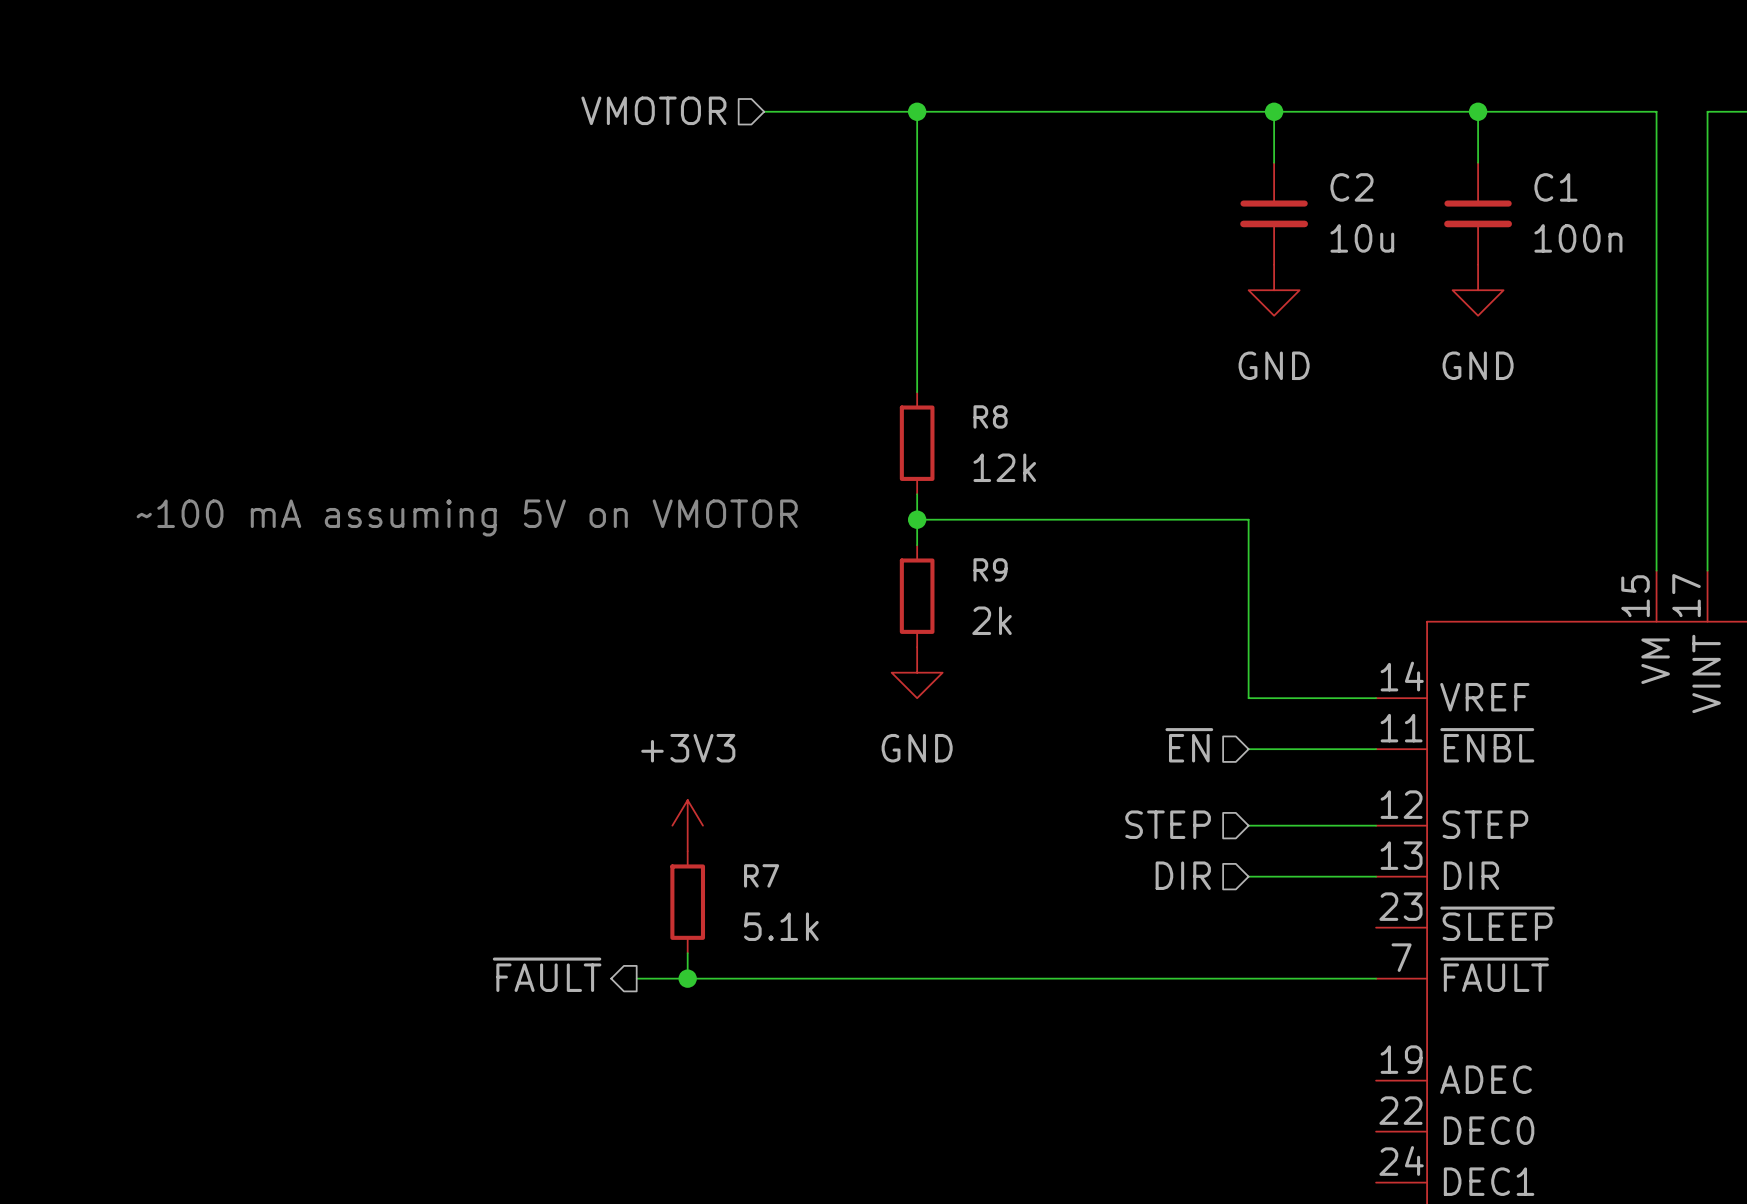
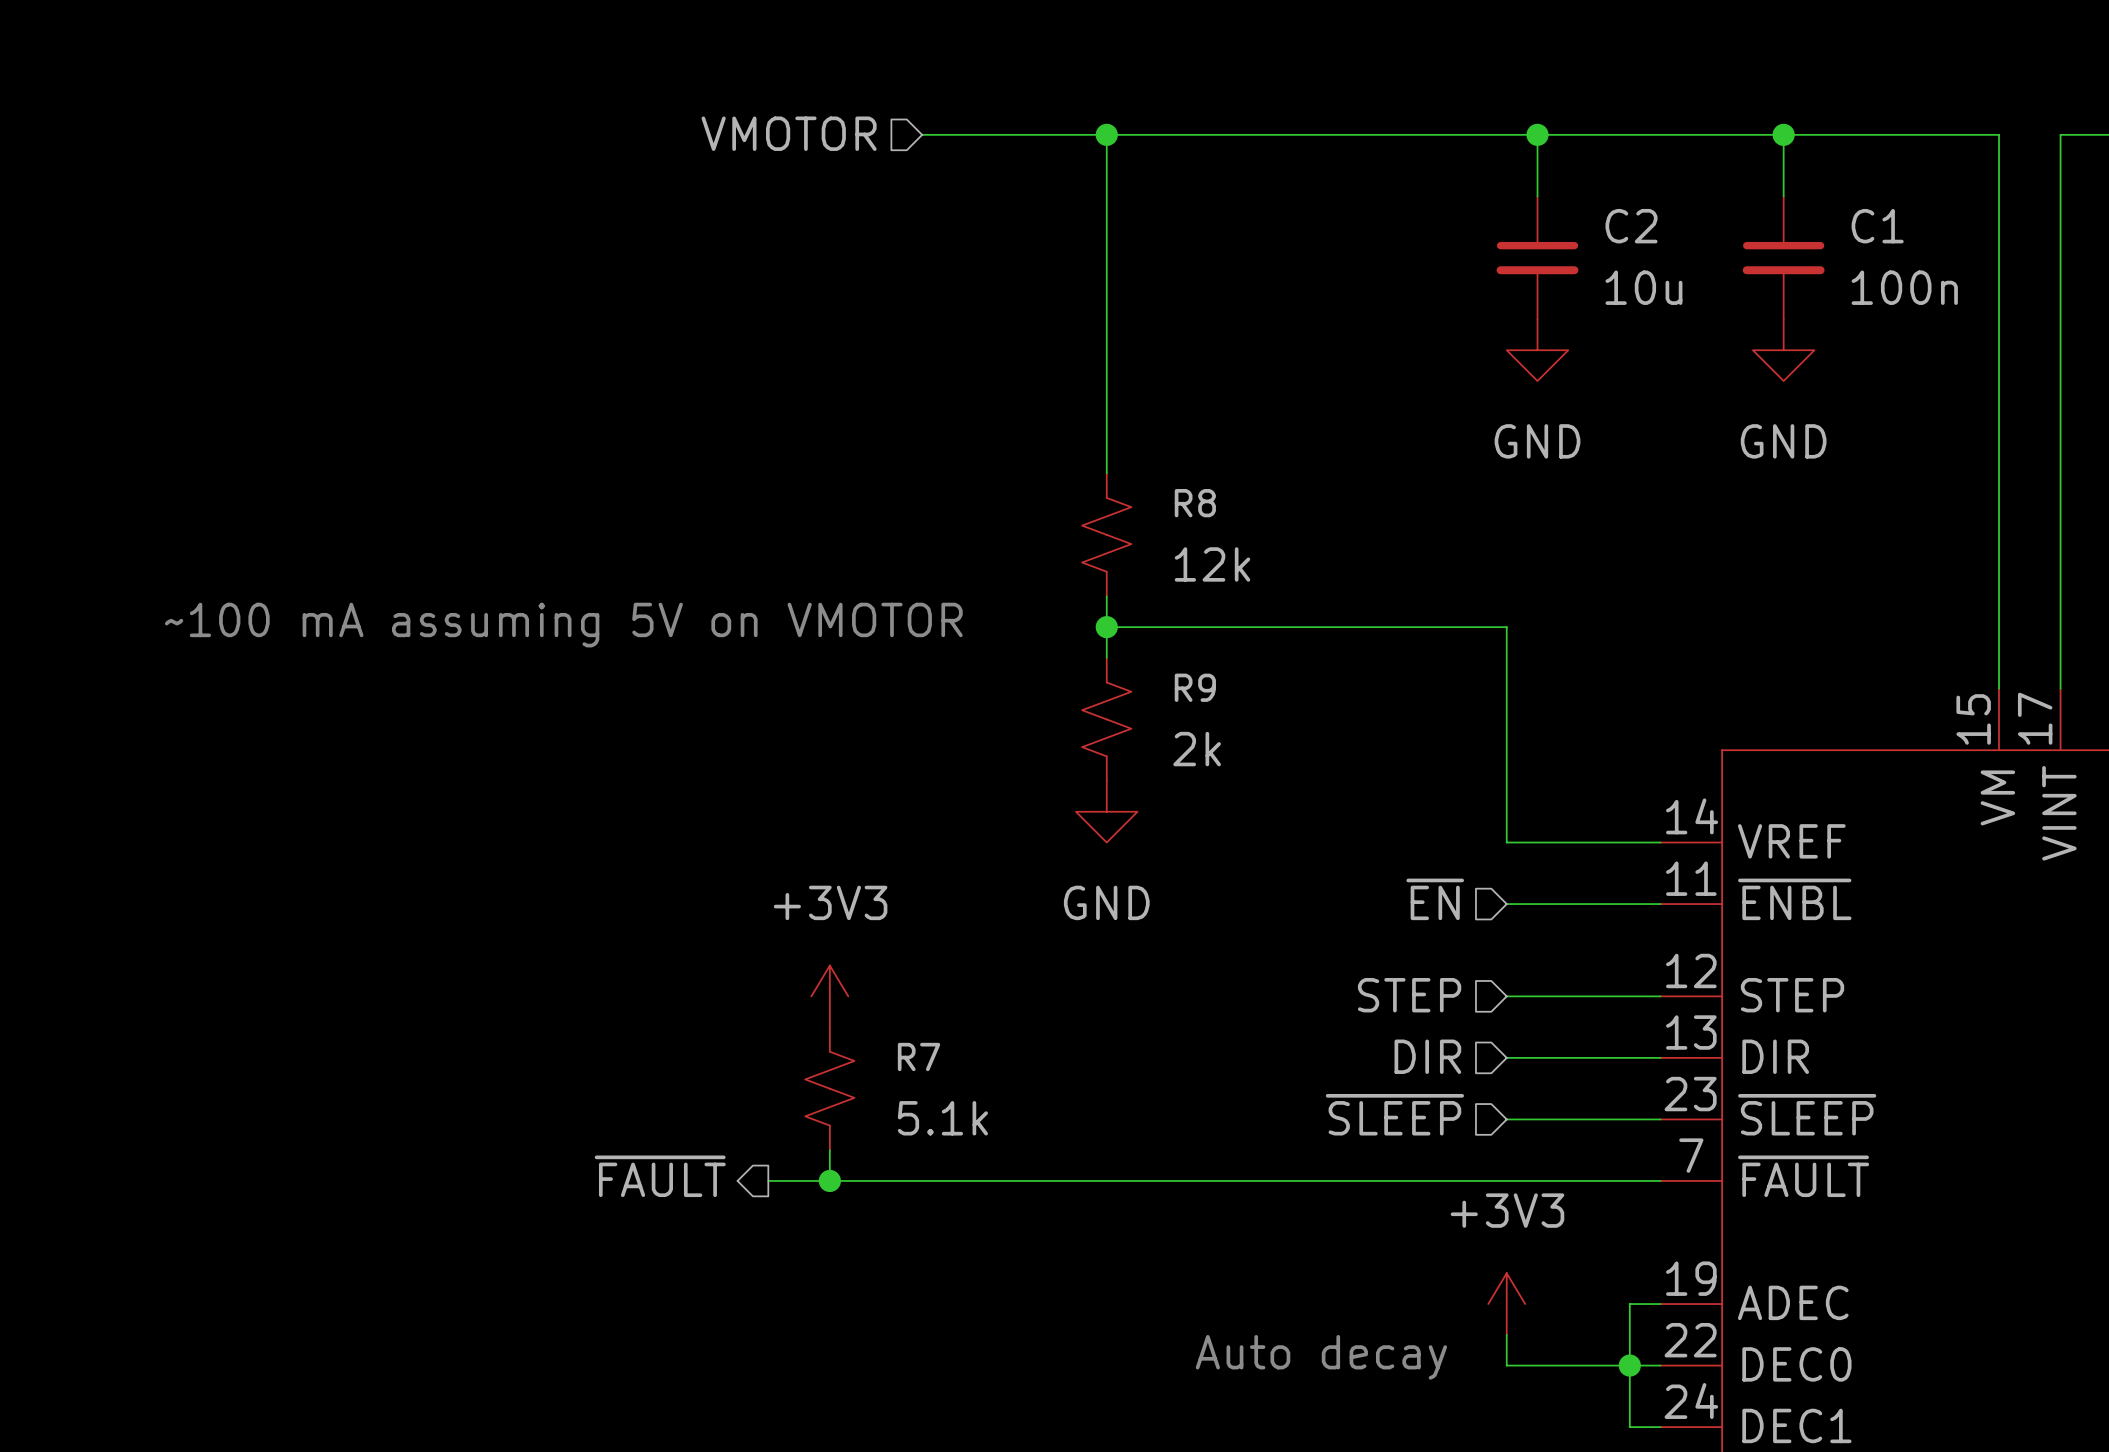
R8 symbol: [899, 392, 935, 495] -> [1082, 473, 1132, 597]
R9 symbol: [899, 545, 935, 648] -> [1082, 657, 1132, 781]
R7 symbol: [670, 851, 706, 954] -> [805, 1027, 855, 1151]
hierarchical label: none -> ~{SLEEP} (1394, 1114)
wire: none -> (1506, 1119) (1660, 1119)
power symbol: none -> +3V3 (1506, 1304)
wire: none -> (1660, 1304) (1629, 1304) (1629, 1427) (1660, 1427)
wire: none -> (1506, 1334) (1506, 1365) (1660, 1365)
text: none -> Auto decay (1321, 1357)
junction: none -> (1629, 1365)

